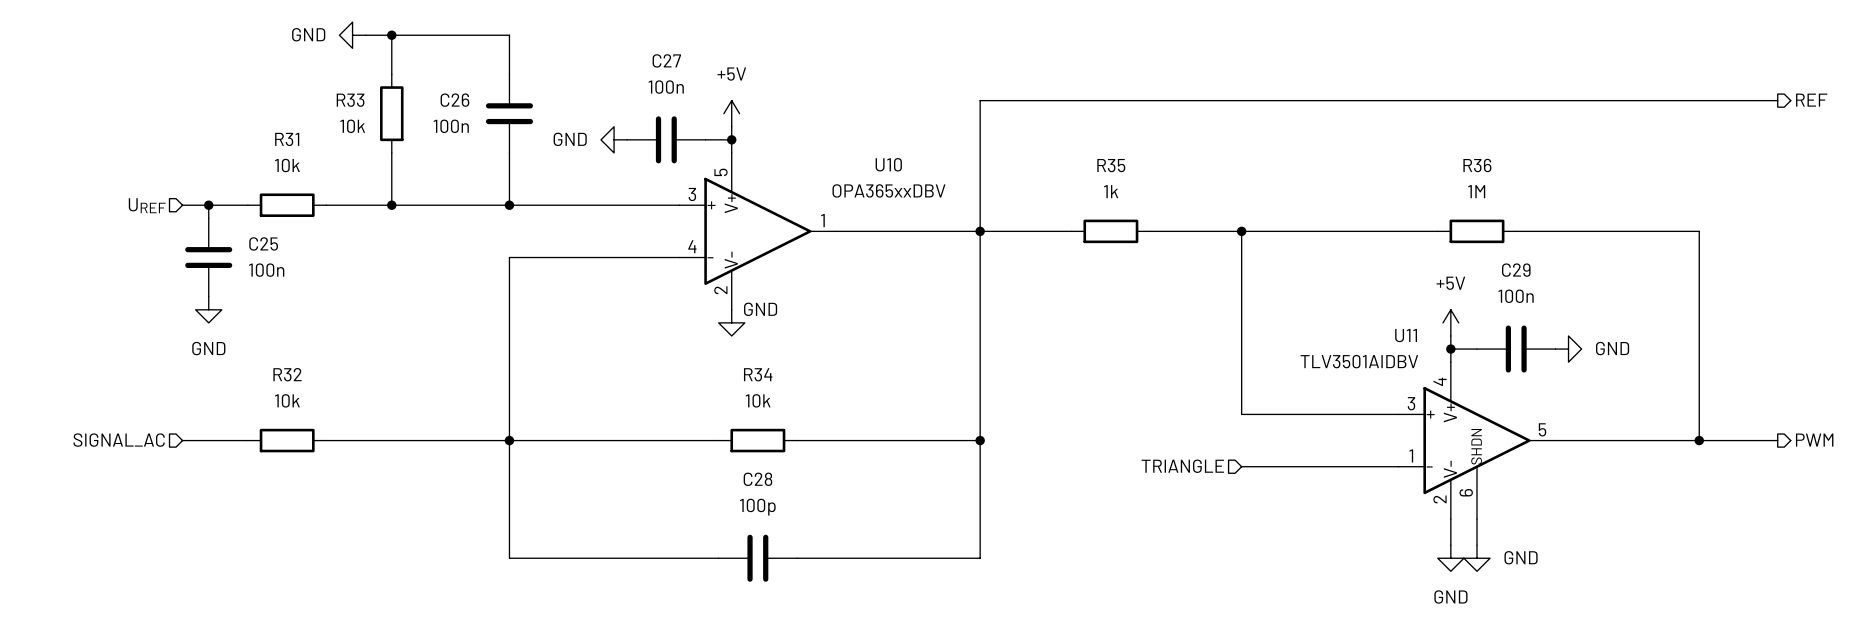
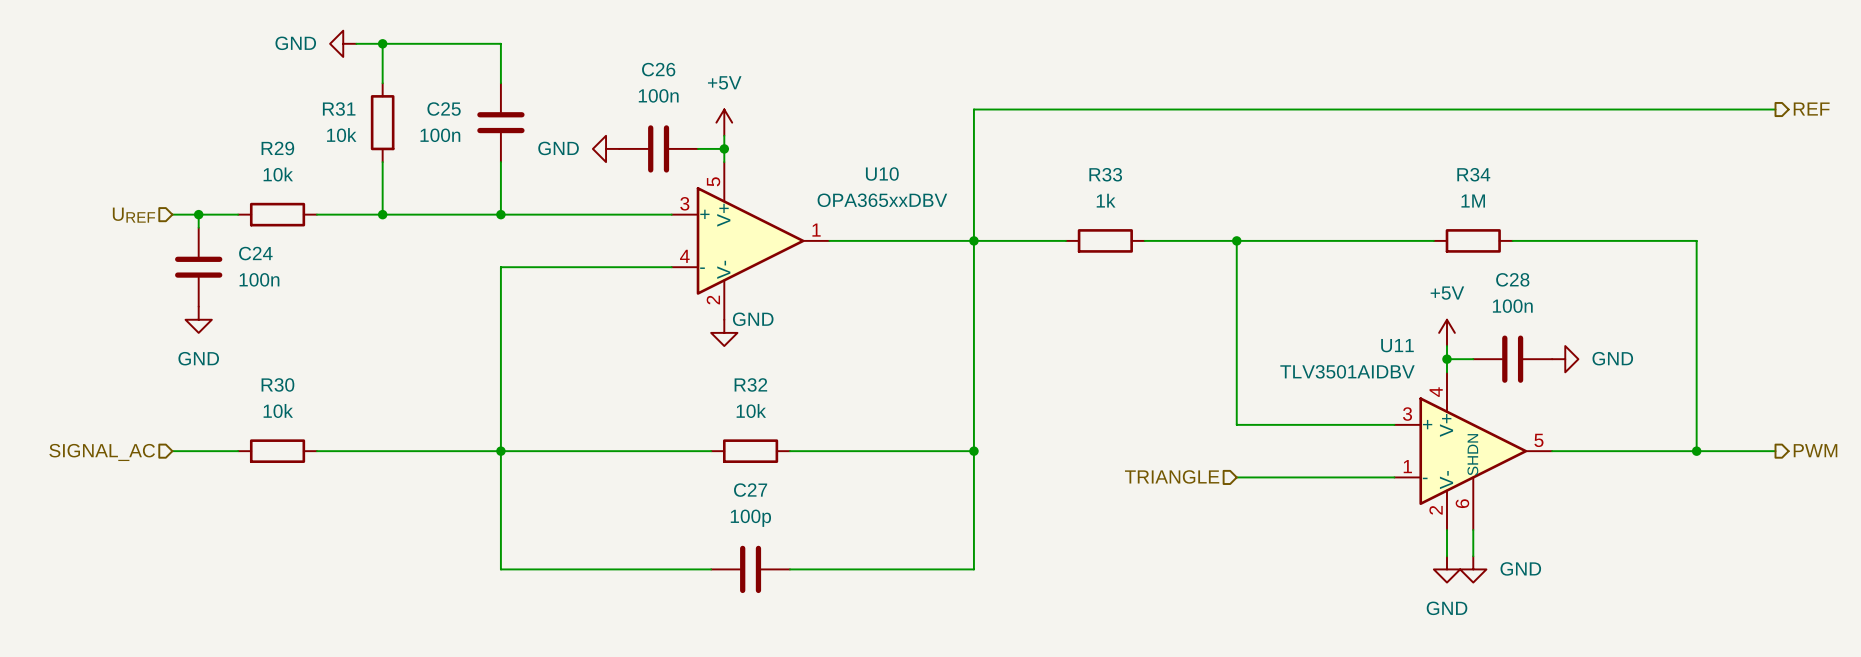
C27 name: C27 (666, 60) -> C26 (658, 69)
R33 name: R33 (350, 100) -> R31 (339, 109)
C26 name: C26 (454, 100) -> C25 (444, 109)
R31 name: R31 (287, 139) -> R29 (277, 148)
R35 name: R35 (1111, 165) -> R33 (1105, 174)
R36 name: R36 (1477, 165) -> R34 (1473, 174)
C25 name: C25 (263, 243) -> C24 (255, 253)
C29 name: C29 (1516, 270) -> C28 (1512, 279)
R32 name: R32 (287, 374) -> R30 (277, 384)
R34 name: R34 (758, 374) -> R32 (750, 384)
C28 name: C28 (757, 479) -> C27 (750, 490)

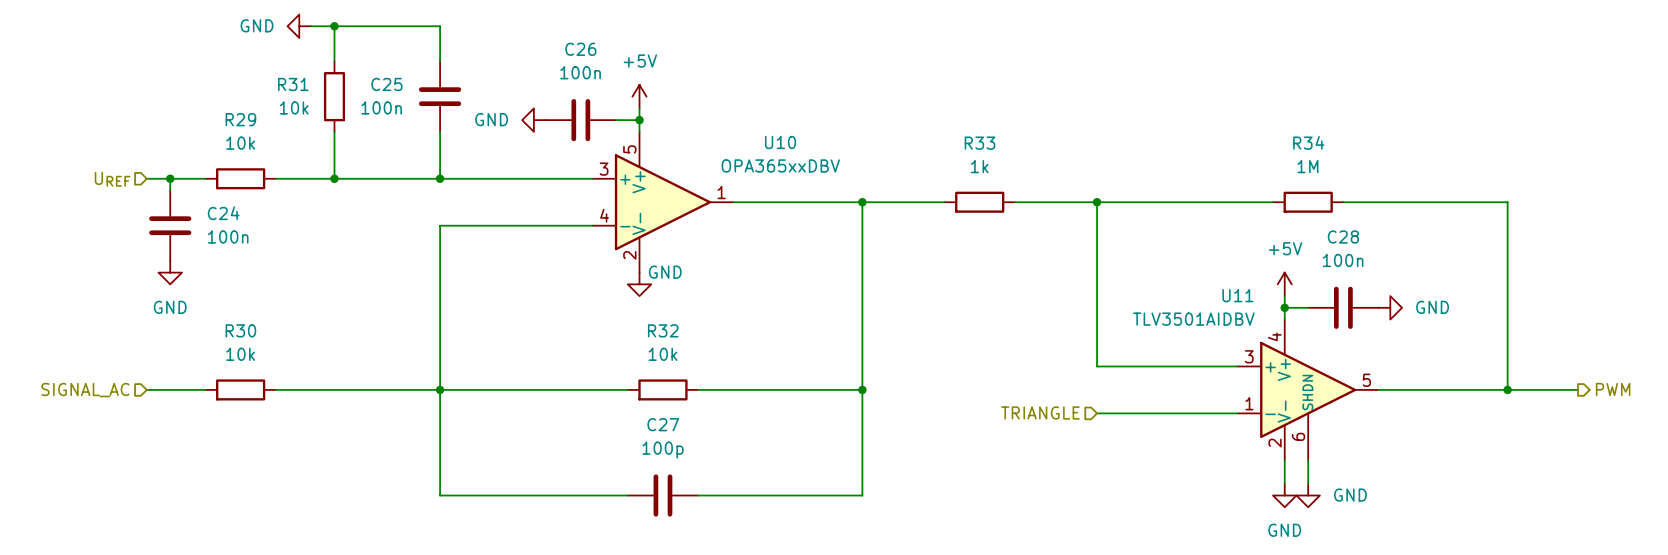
wire: (1775, 109) (973, 109) (973, 240) -> none
hierarchical label: REF (1811, 109) -> none

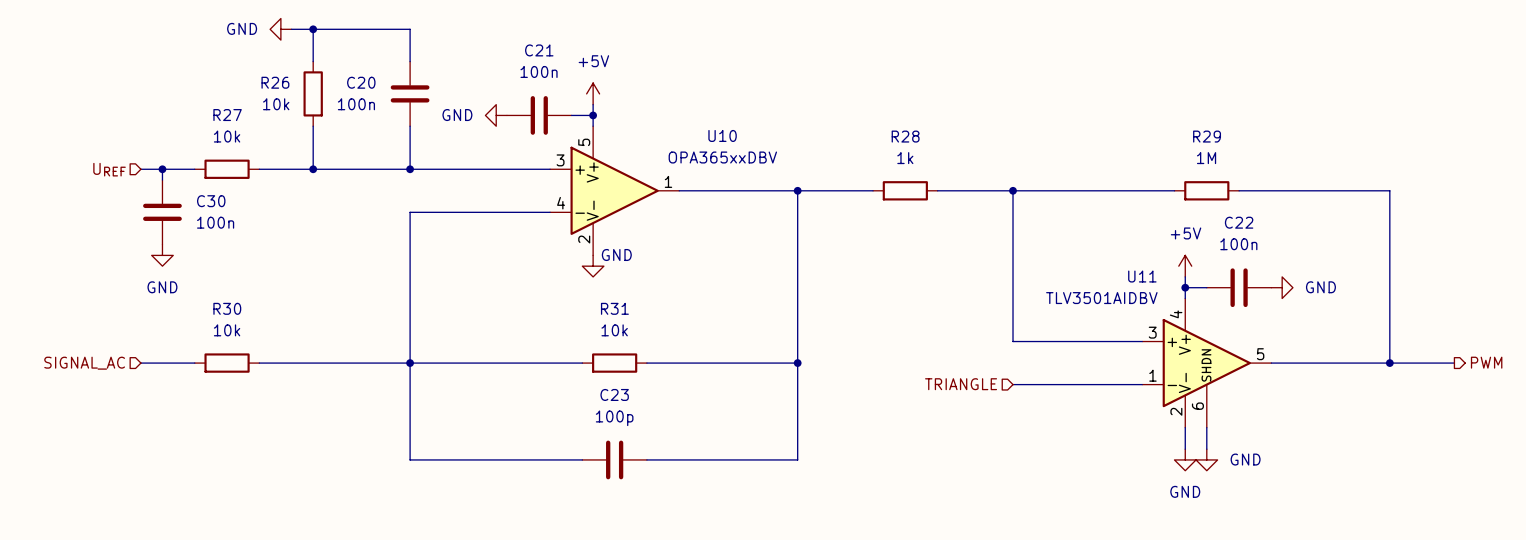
C26 name: C26 (580, 49) -> C21 (539, 50)
R31 name: R31 (293, 84) -> R26 (275, 82)
C25 name: C25 (386, 84) -> C20 (361, 82)
R29 name: R29 (240, 119) -> R27 (227, 115)
R34 name: R34 (1308, 142) -> R29 (1207, 136)
R33 name: R33 (979, 143) -> R28 (905, 136)
C24 name: C24 (223, 213) -> C30 (211, 201)
C28 name: C28 (1343, 236) -> C22 (1239, 222)
R32 name: R32 (663, 330) -> R31 (614, 308)
C27 name: C27 (663, 424) -> C23 (614, 394)

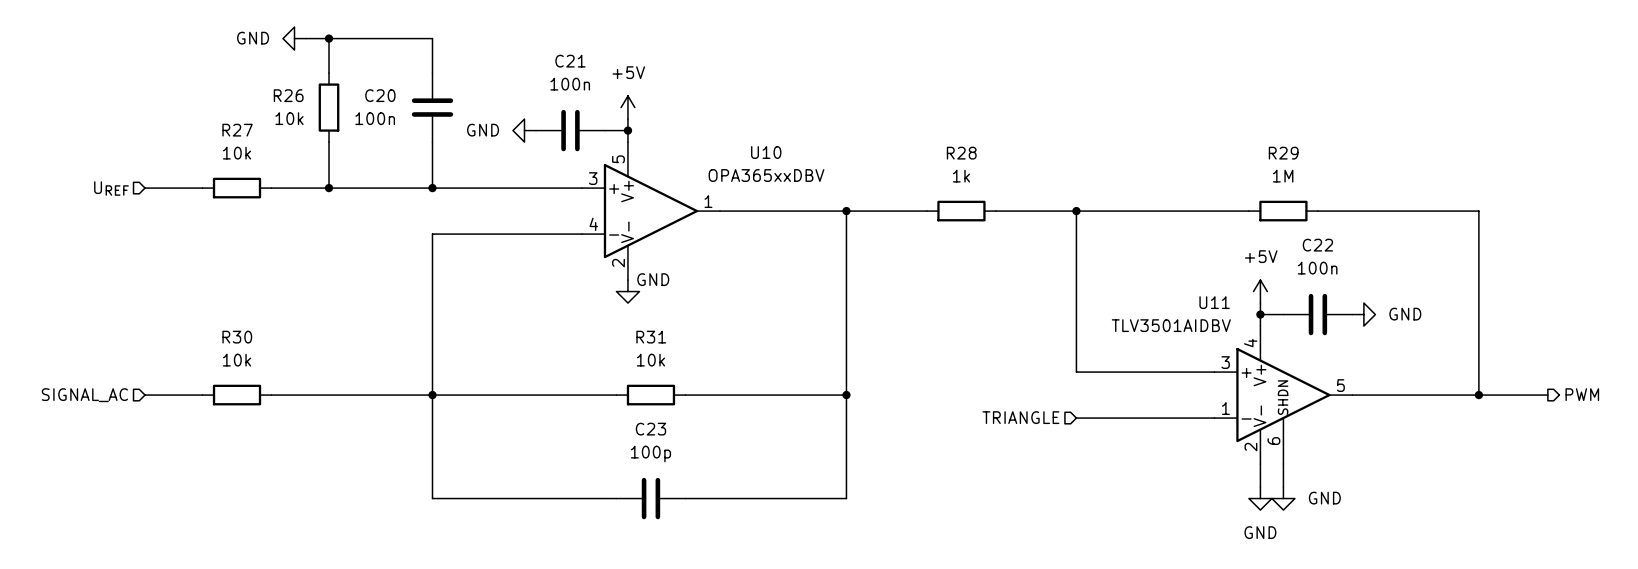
wire: (162, 169) (162, 180) -> none
junction: (162, 169) -> none
C30: 100n (162, 212) -> none
power symbol: GND (162, 255) -> none

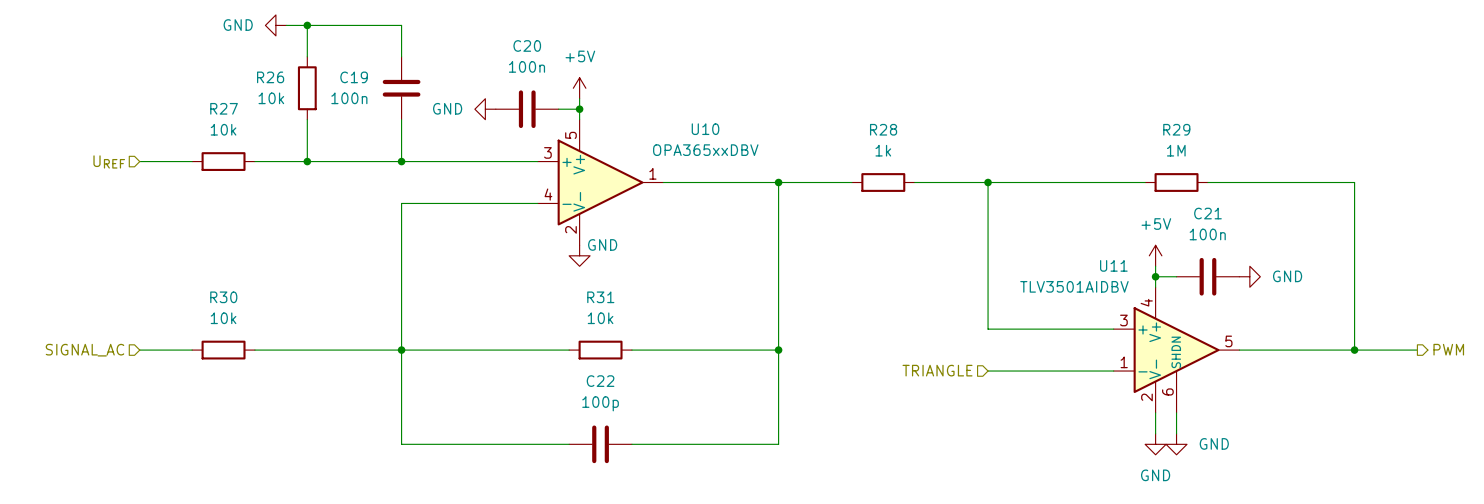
C21 name: C21 (570, 61) -> C20 (527, 45)
C20 name: C20 (380, 95) -> C19 (354, 77)
C22 name: C22 (1317, 245) -> C21 (1207, 213)
C23 name: C23 (650, 429) -> C22 (600, 381)

